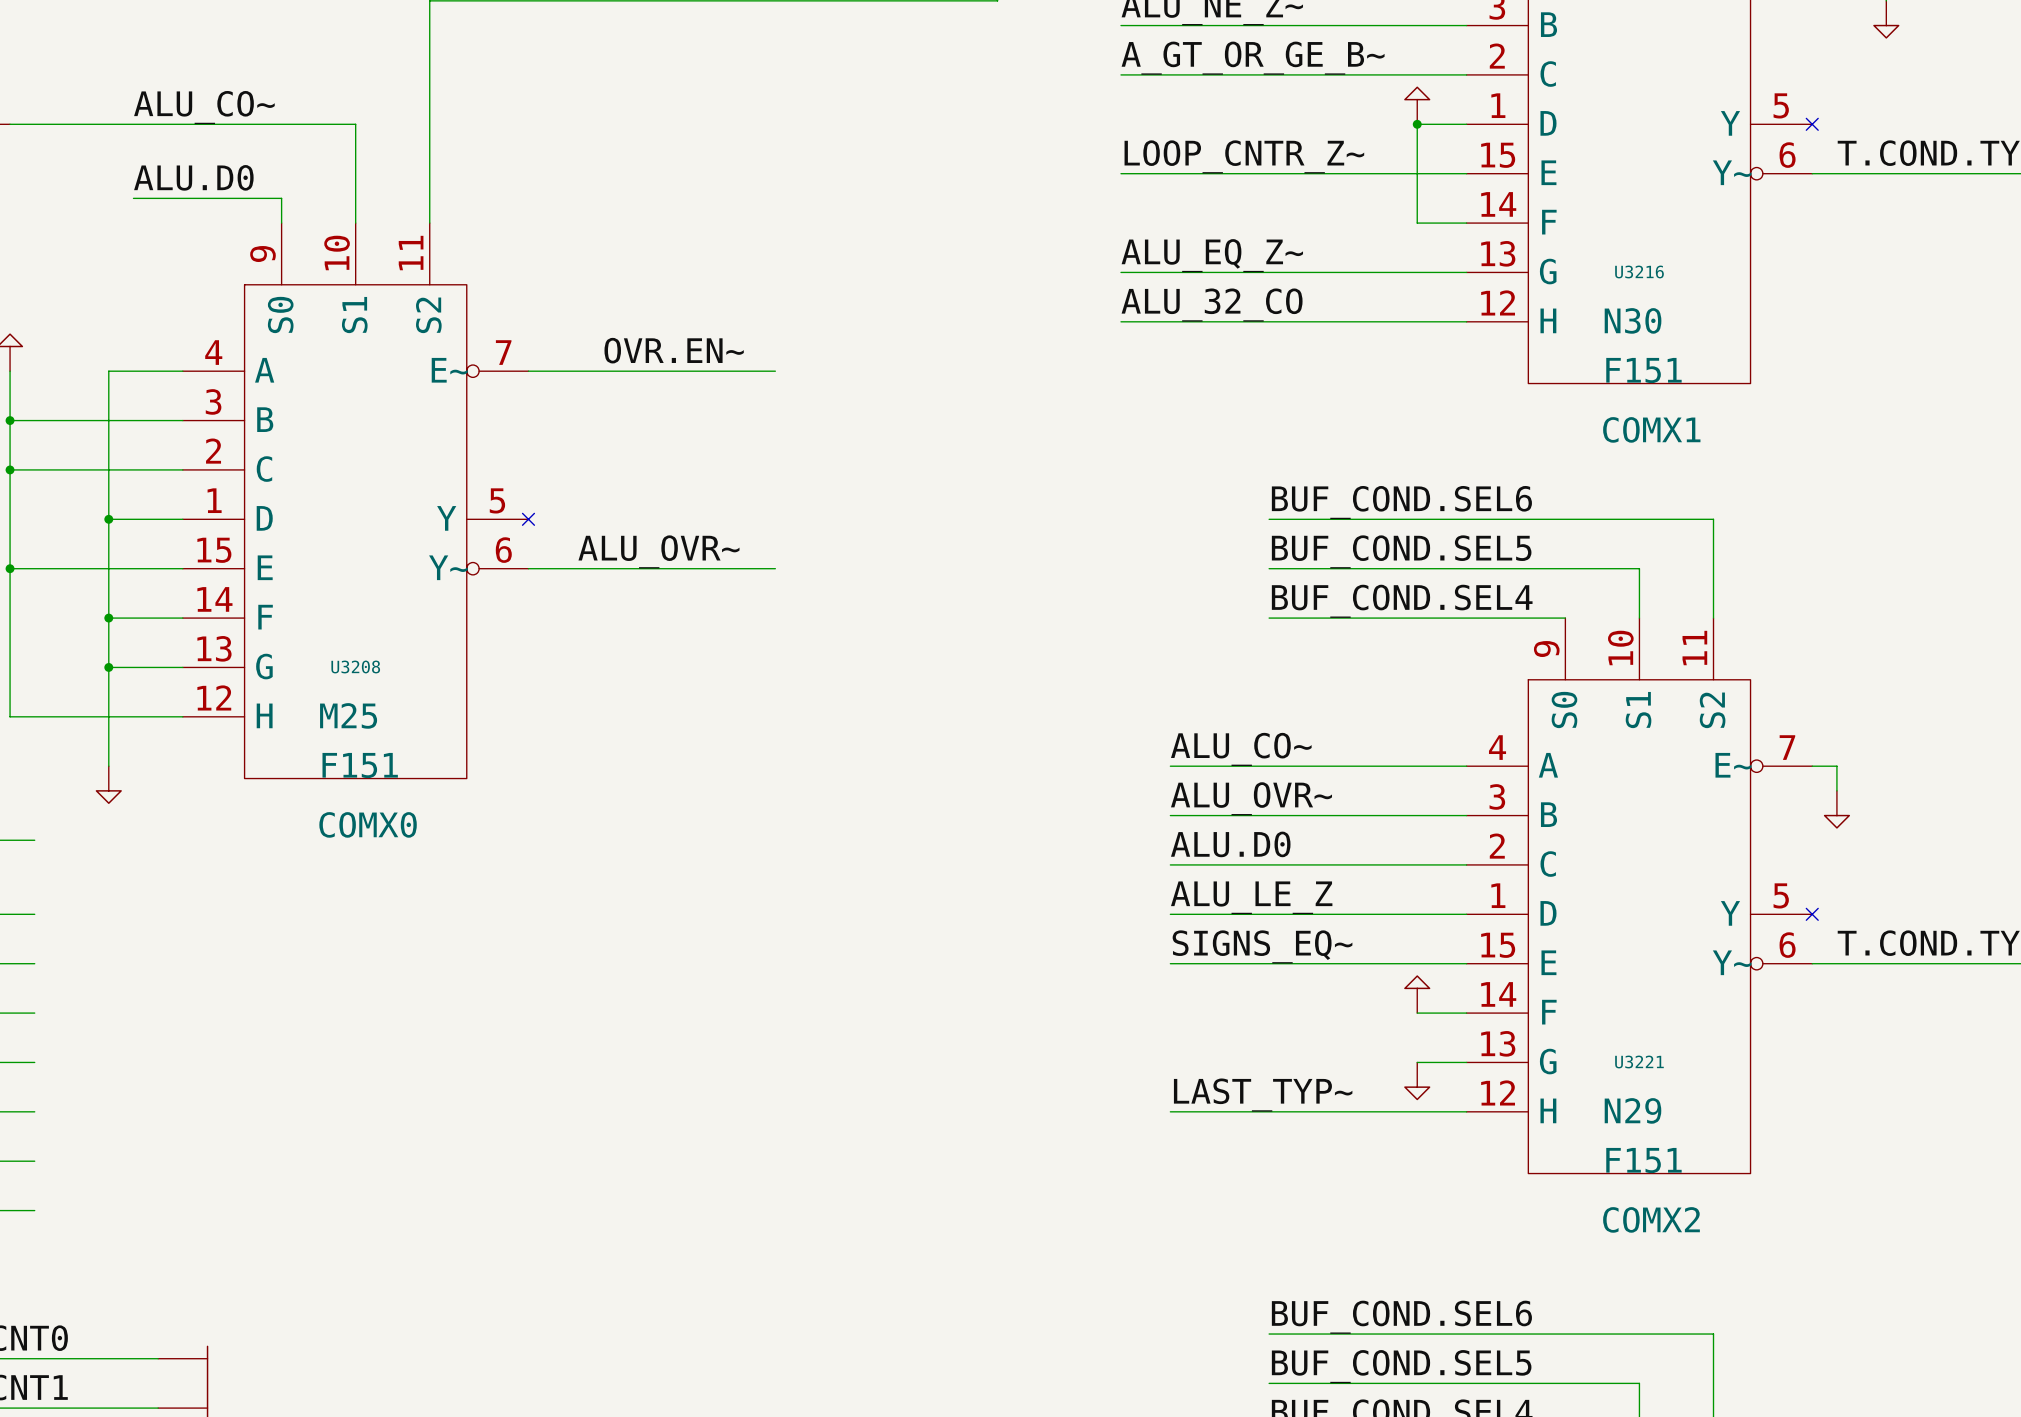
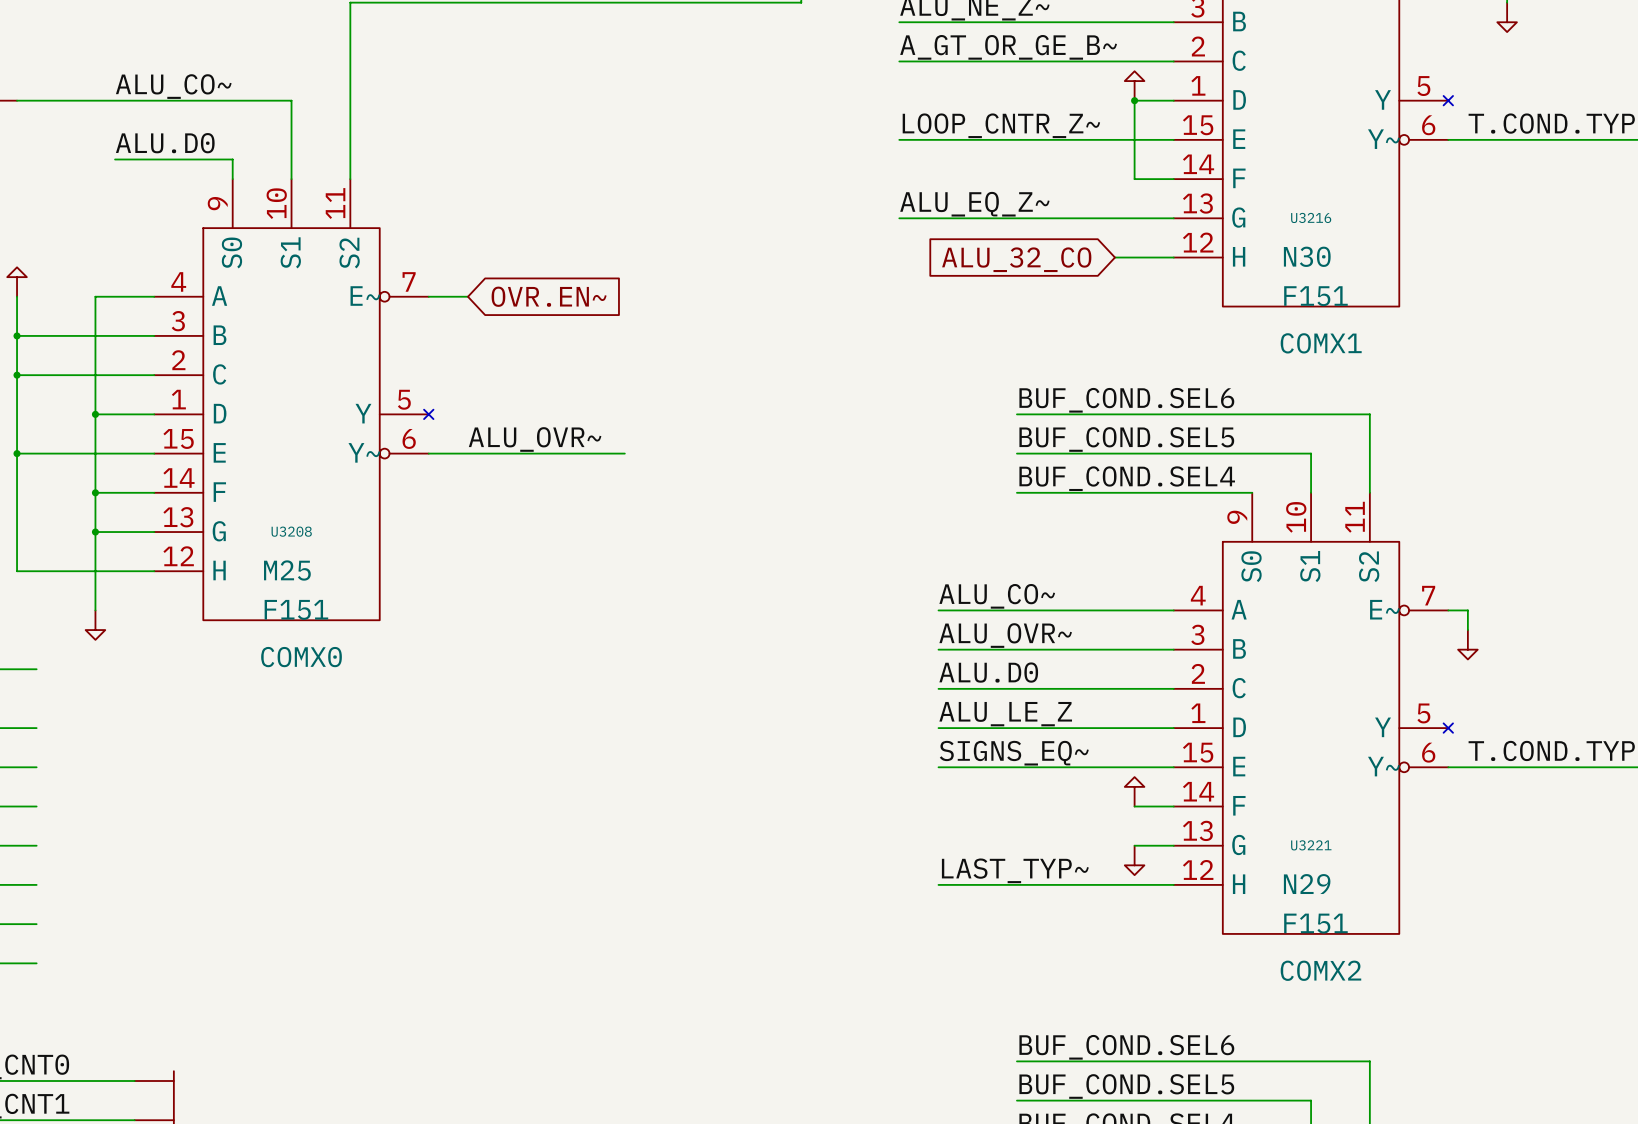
label: ALU_32_CO (1212, 305) -> none
wire: (1120, 321) (1392, 321) -> none
global label: none -> ALU_32_CO (1016, 259)
label: OVR.EN~ (674, 350) -> none
wire: (577, 371) (775, 371) -> none
global label: none -> OVR.EN~ (549, 296)

